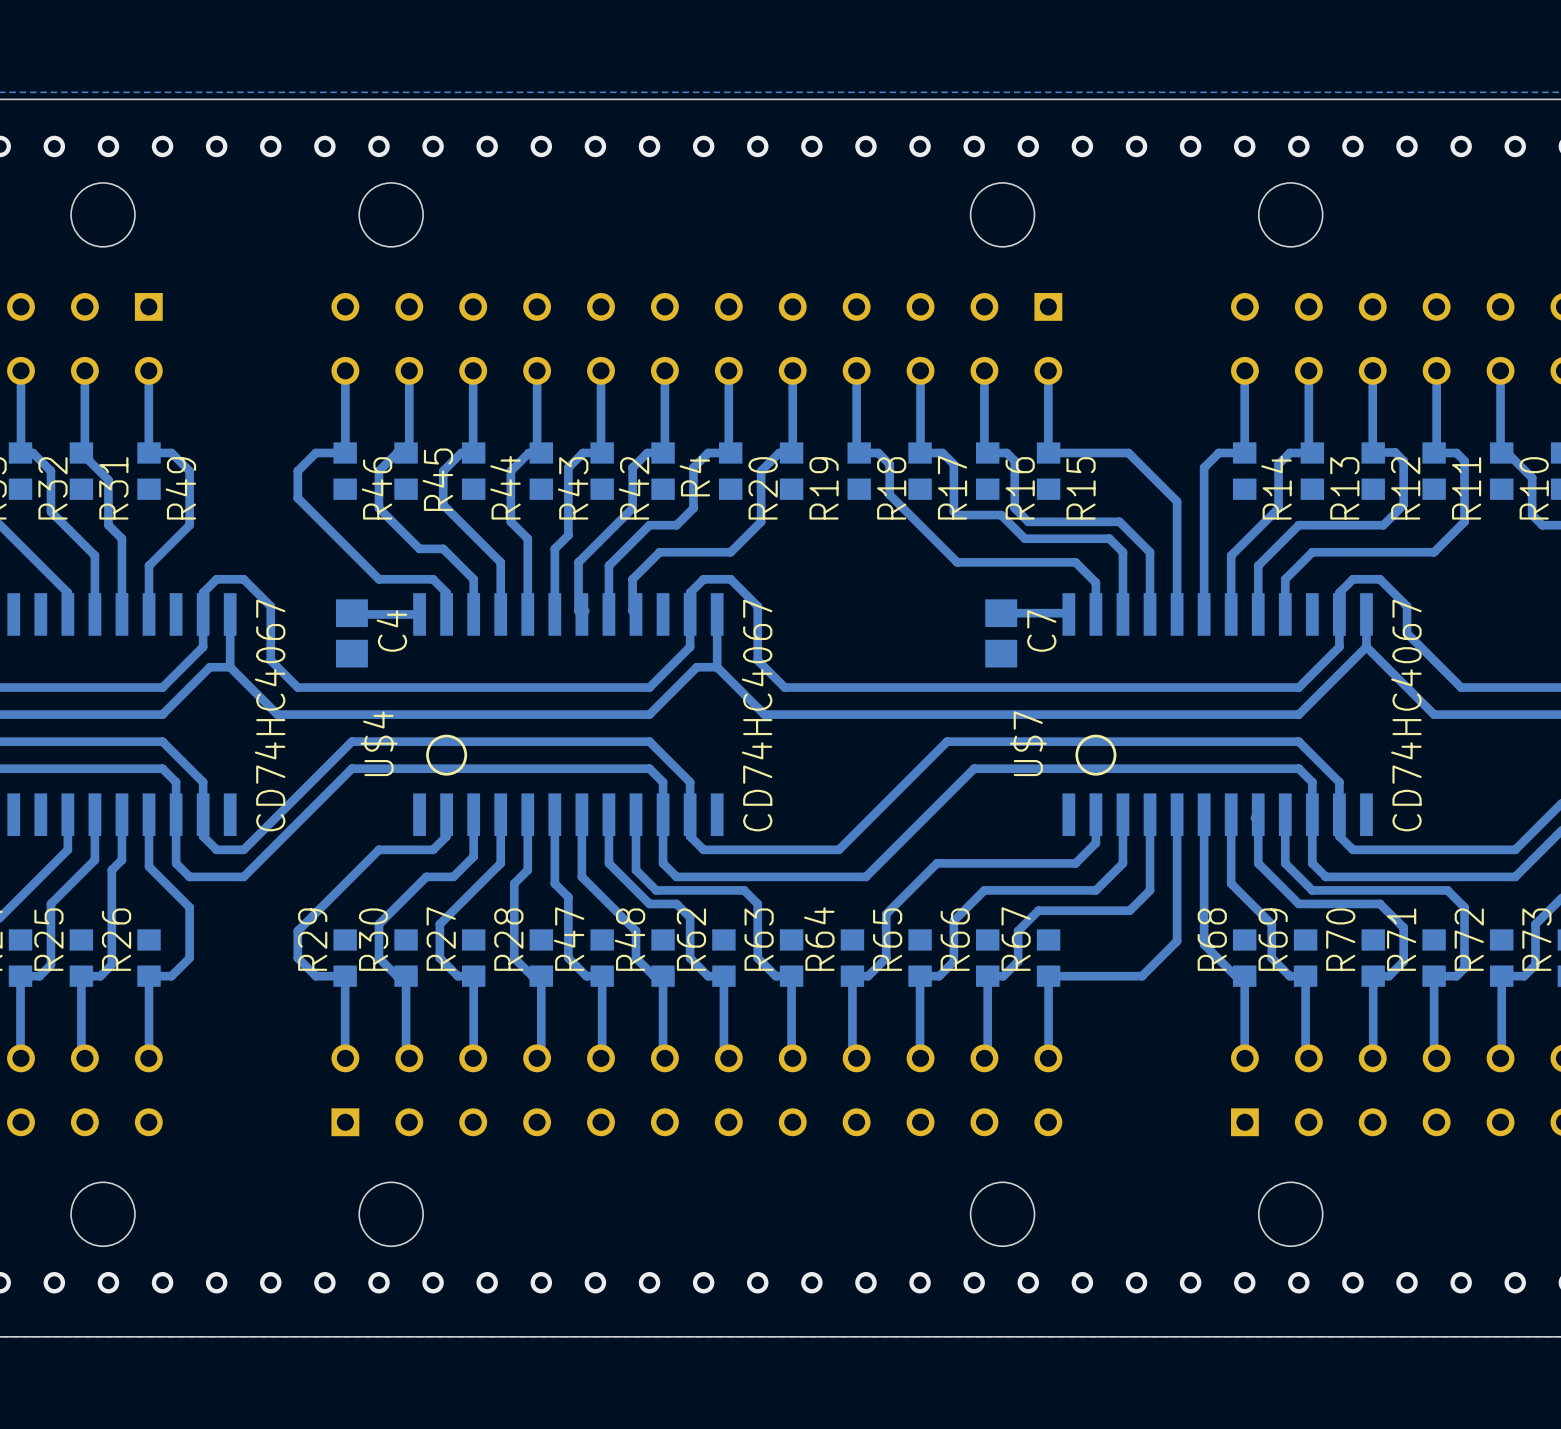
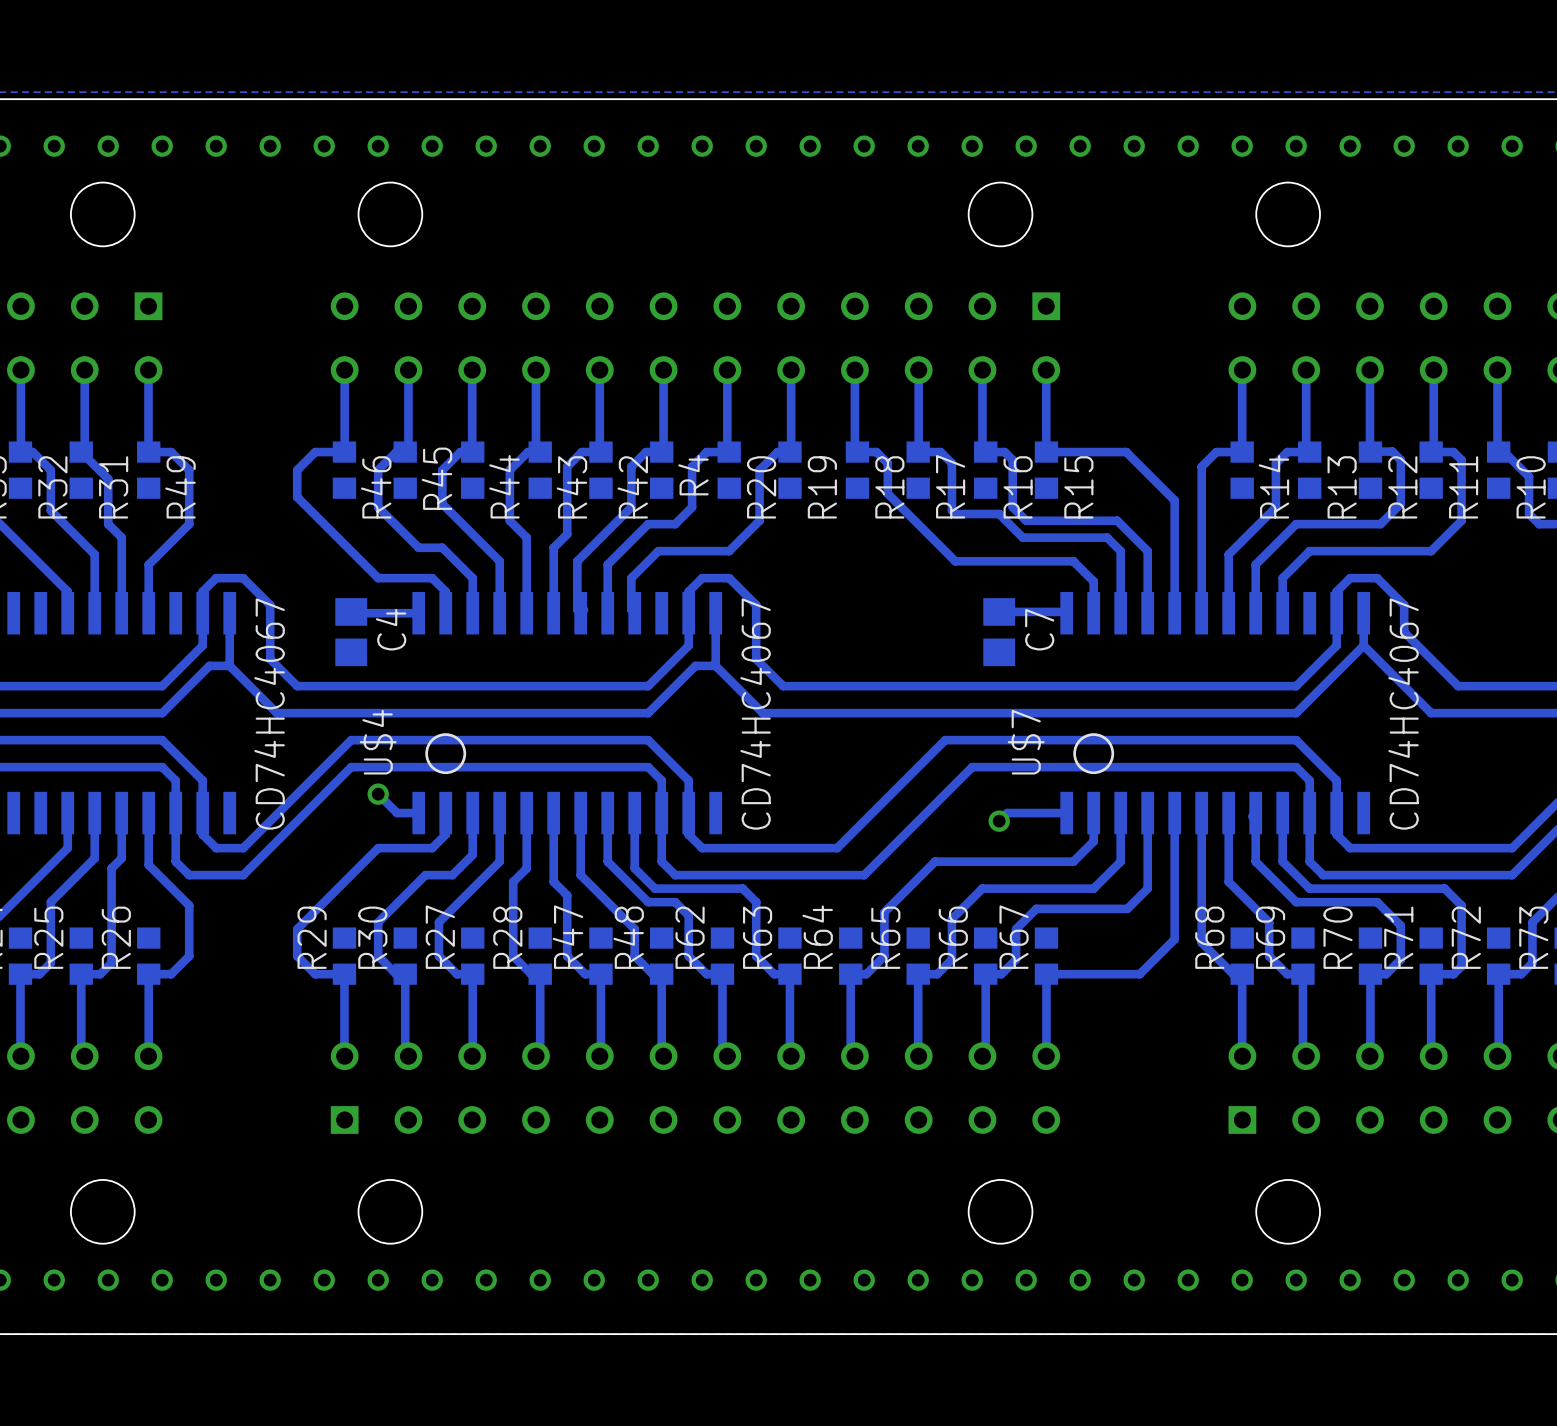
track: none -> (378, 794) (397, 813) (418, 813)
via: none -> (378, 794)
track: none -> (1066, 813) (1007, 813) (999, 821)
via: none -> (999, 821)

